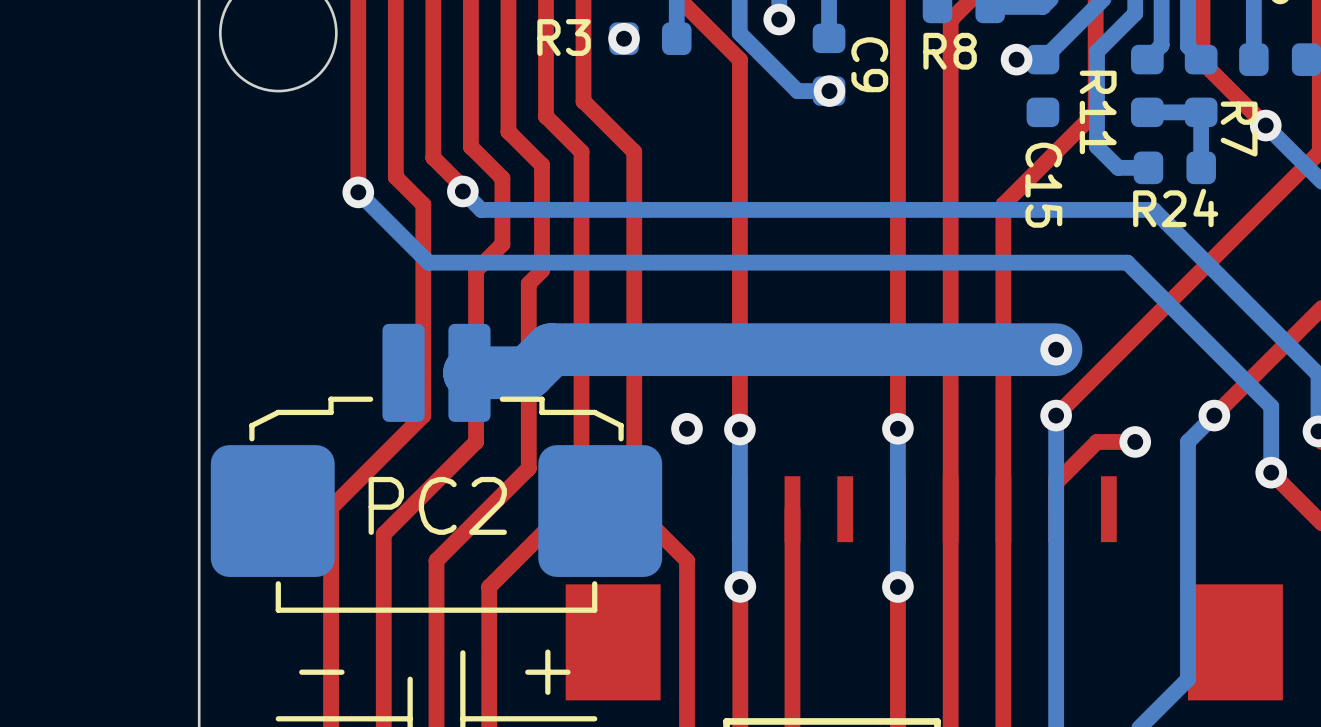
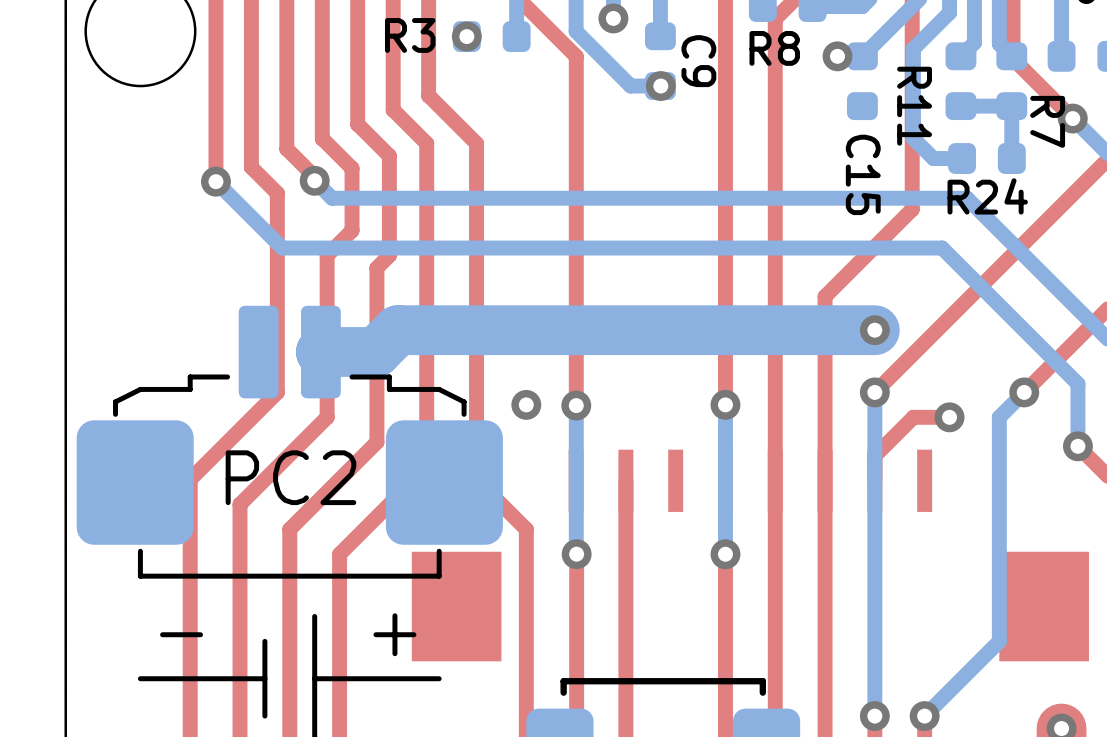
top track: (1095, 112) (1003, 204) (1003, 314) -> (912, 106) (912, 209) (825, 296)

